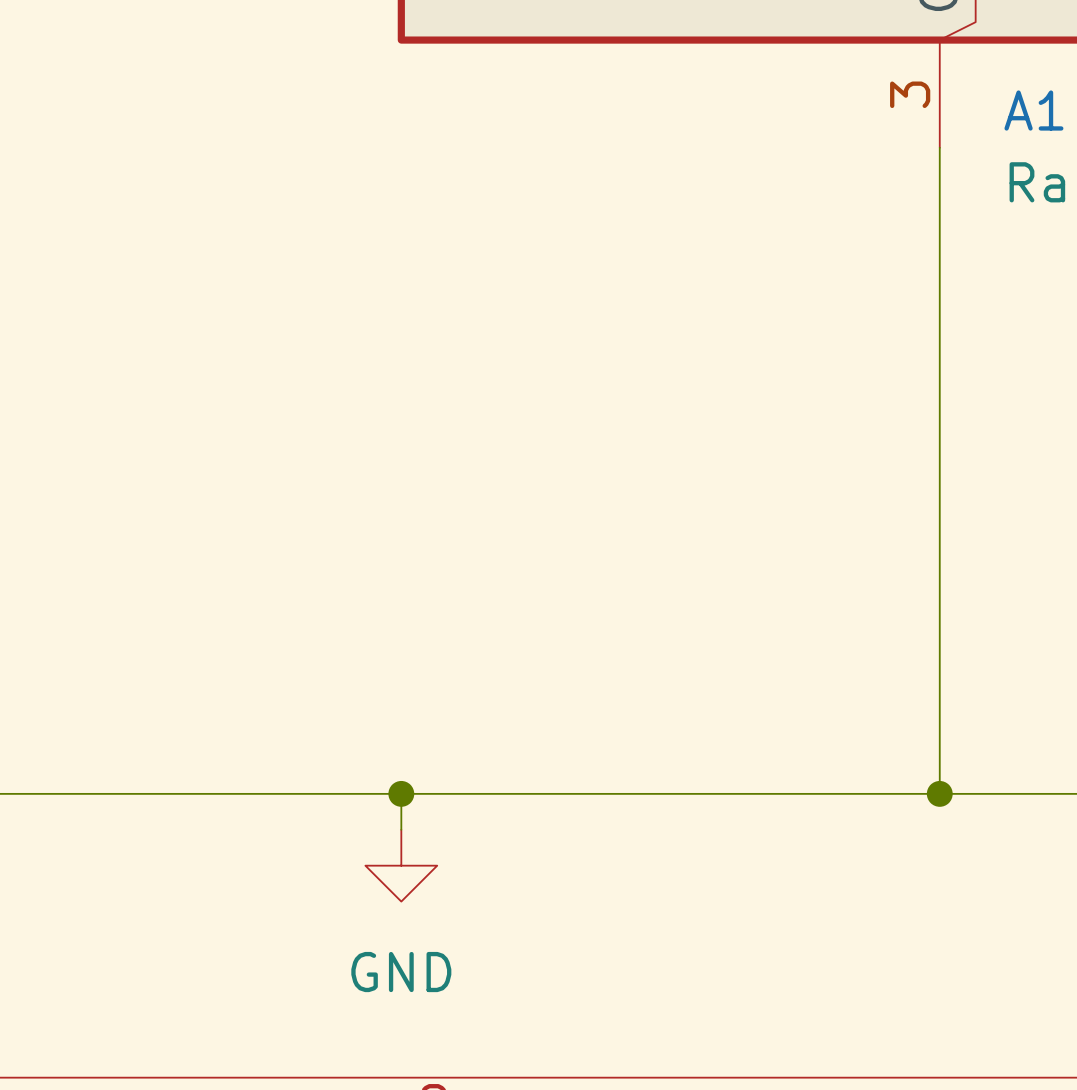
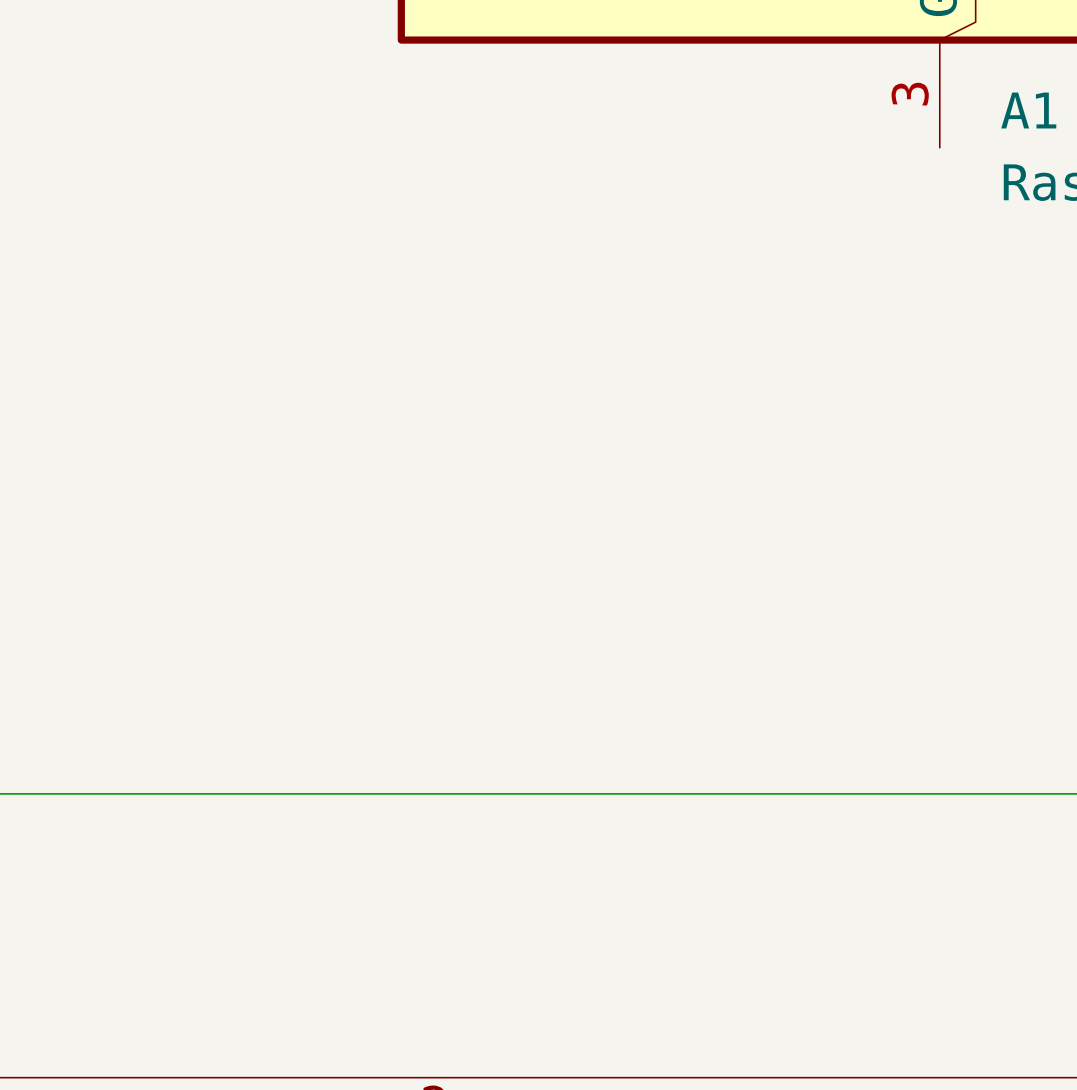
wire: (939, 147) (939, 793) -> none
wire: (401, 793) (401, 829) -> none
junction: (401, 793) -> none
junction: (939, 793) -> none
power symbol: GND (401, 865) -> none

